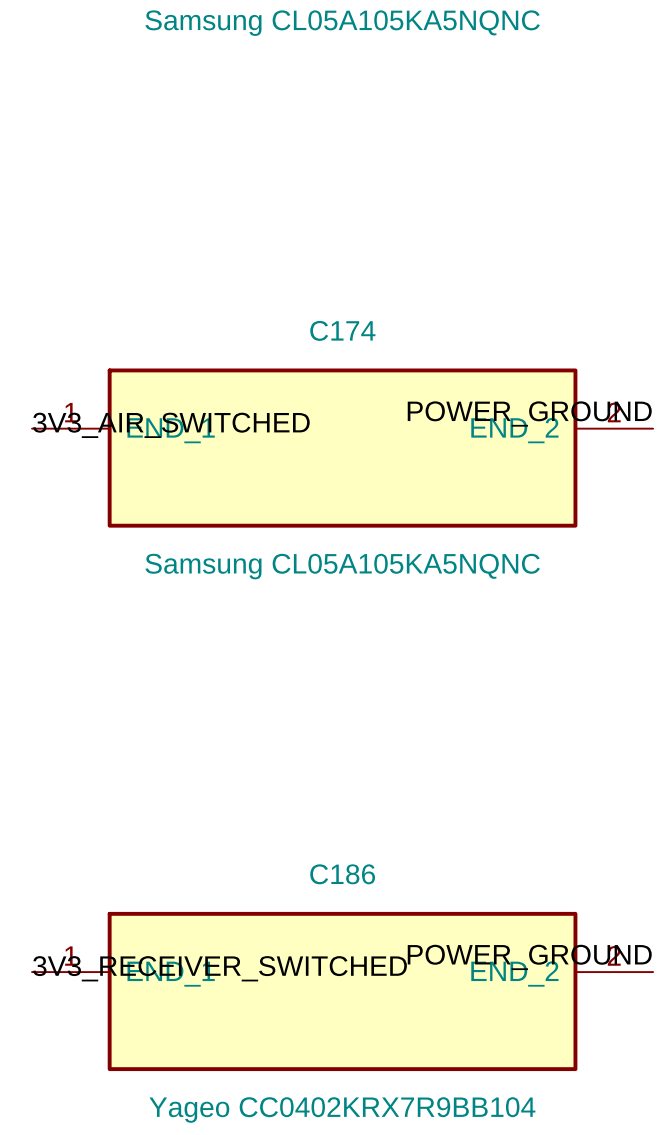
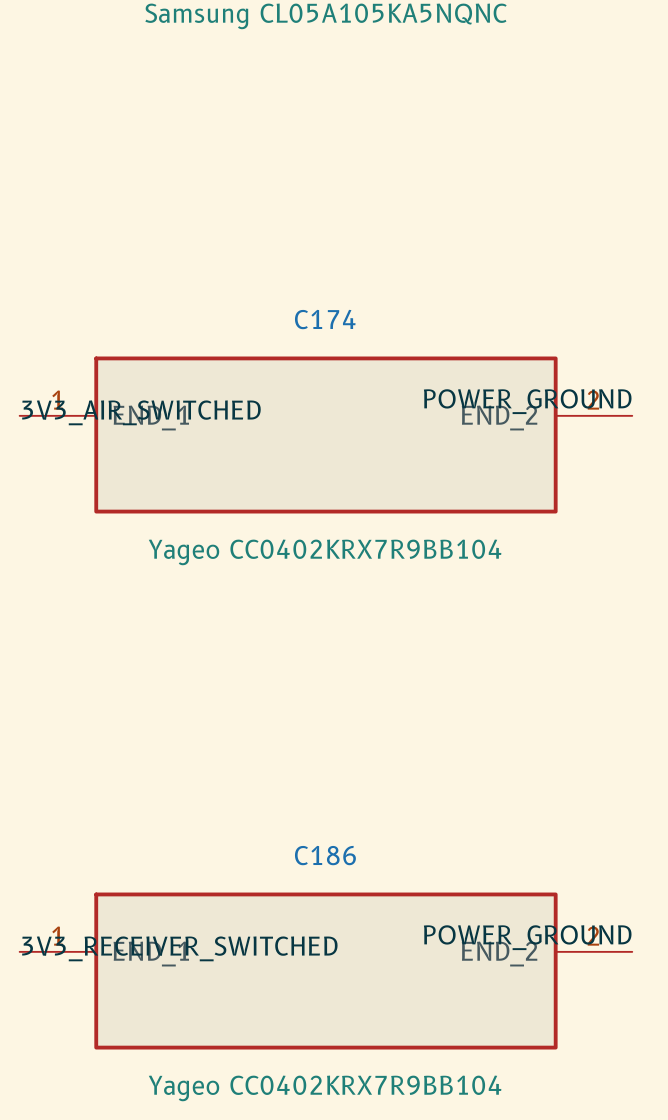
C174 value: Samsung CL05A105KA5NQNC (342, 566) -> Yageo CC0402KRX7R9BB104 (325, 552)

